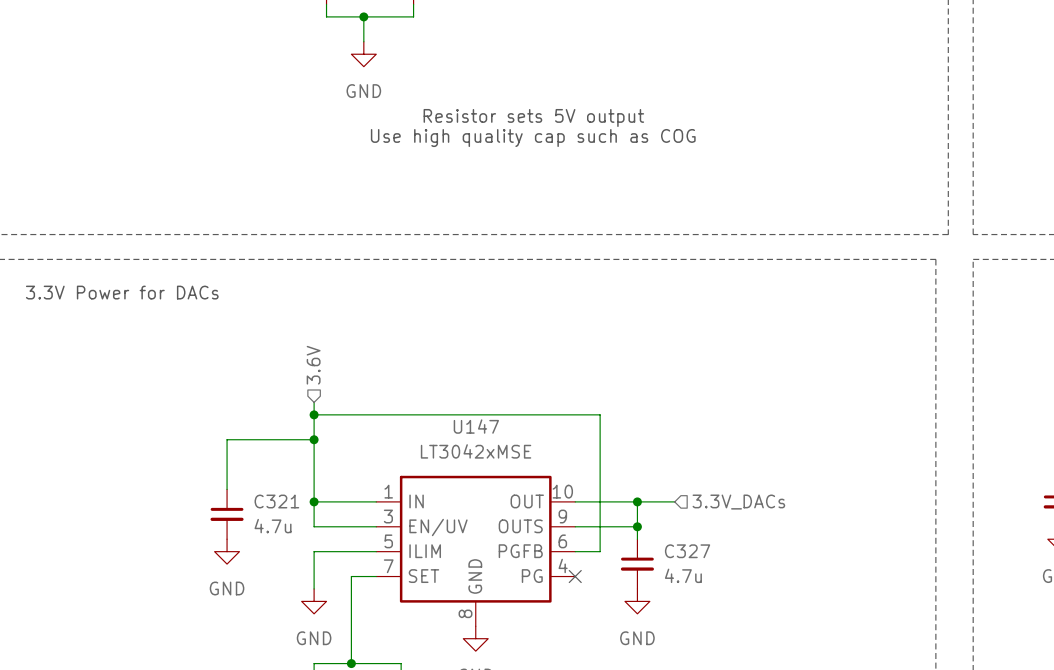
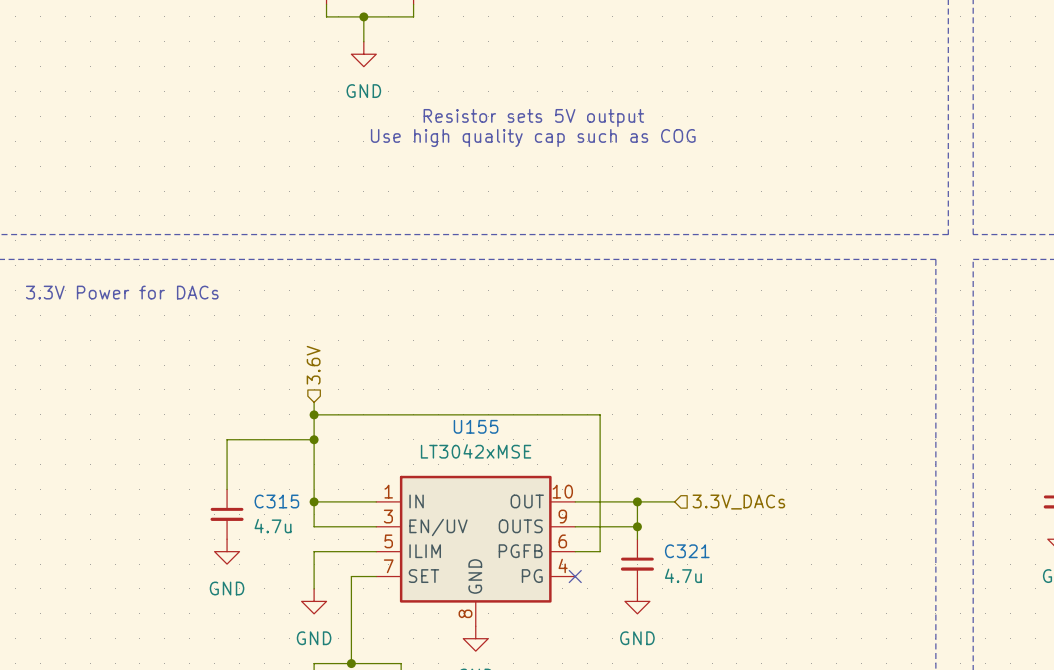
U147 name: U147 (476, 426) -> U155 (476, 426)
C321 name: C321 (276, 501) -> C315 (276, 501)
C327 name: C327 (687, 551) -> C321 (687, 551)

